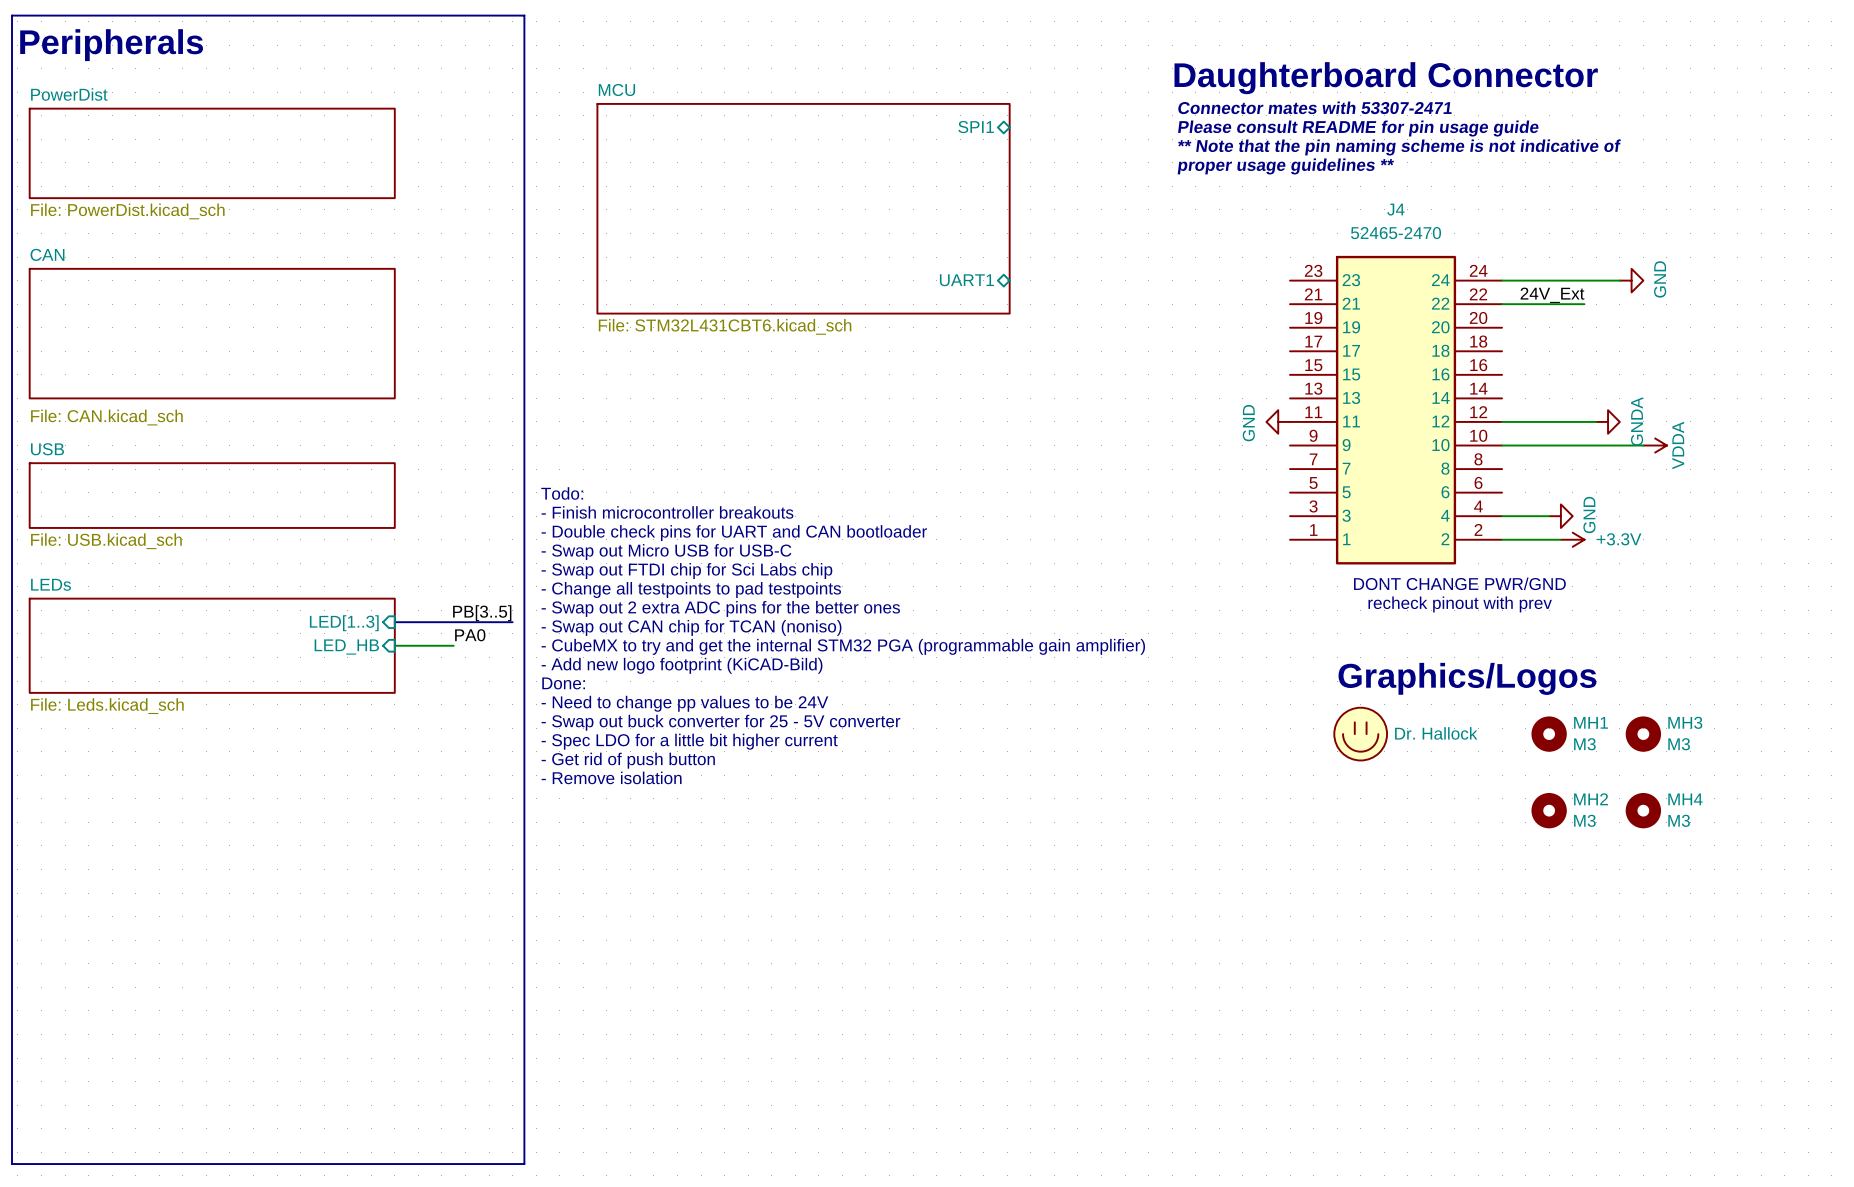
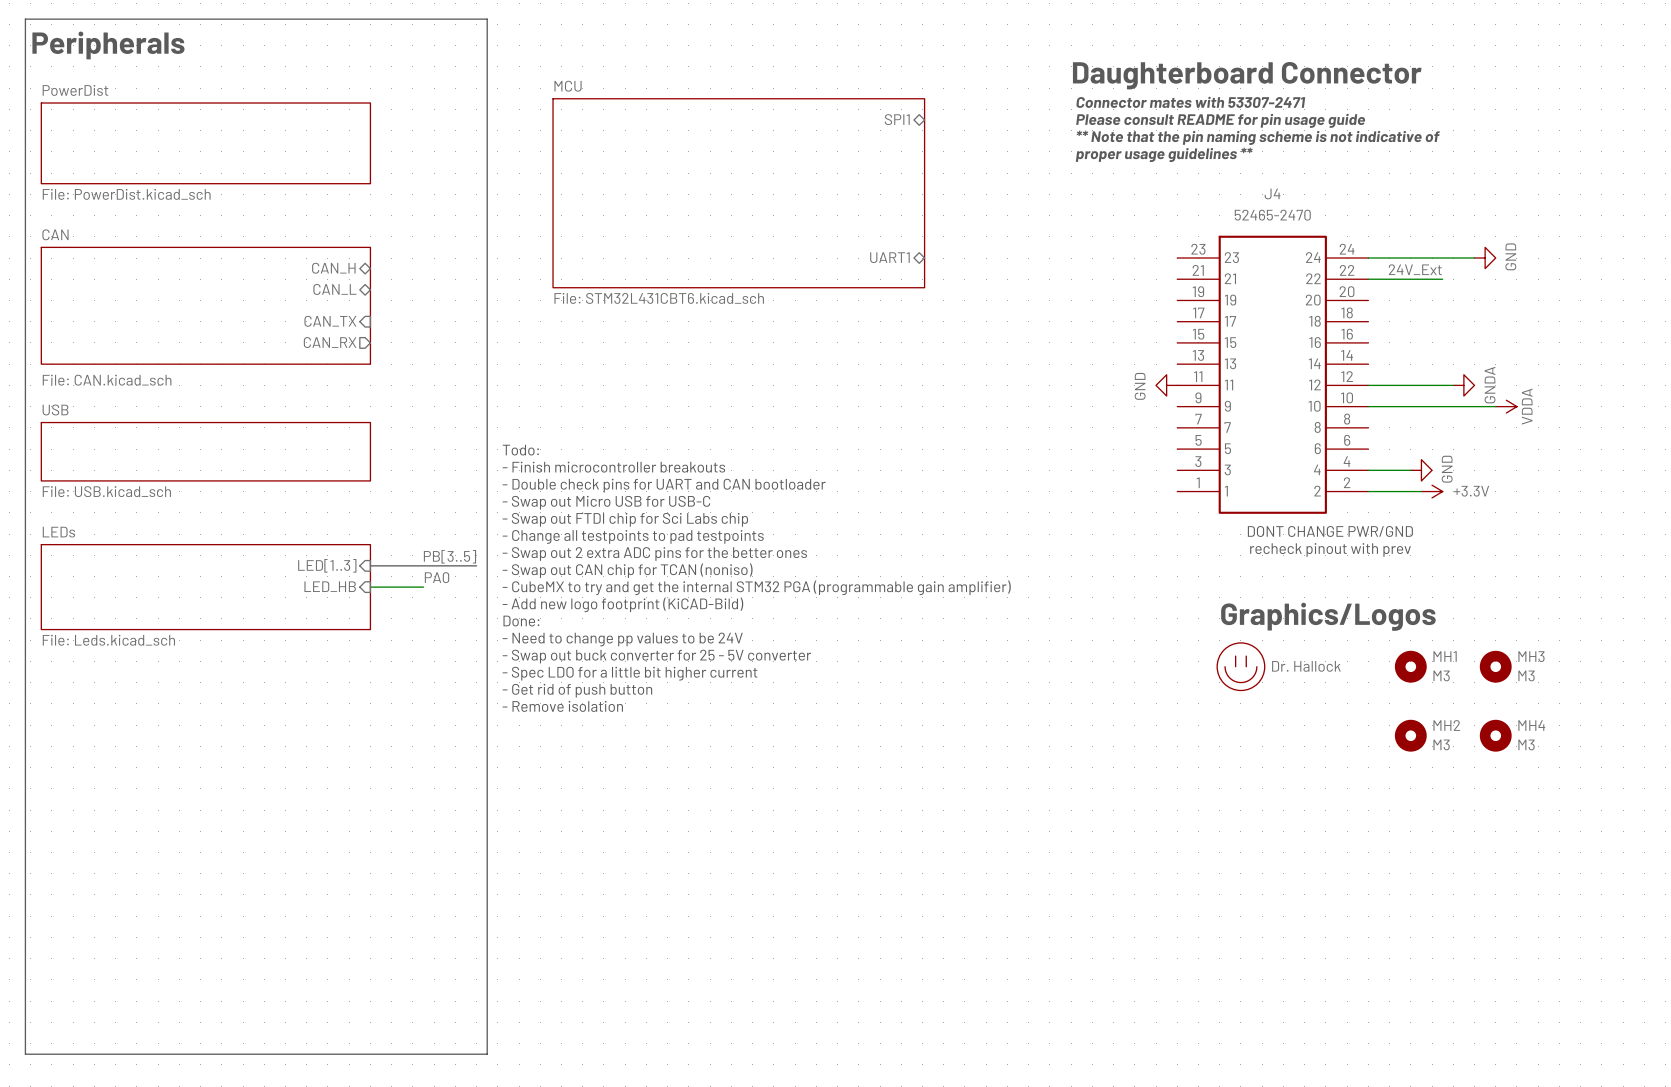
sheet pin: none -> CAN_H (333, 268)
sheet pin: none -> CAN_L (334, 289)
sheet pin: none -> CAN_TX (330, 321)
sheet pin: none -> CAN_RX (330, 342)

